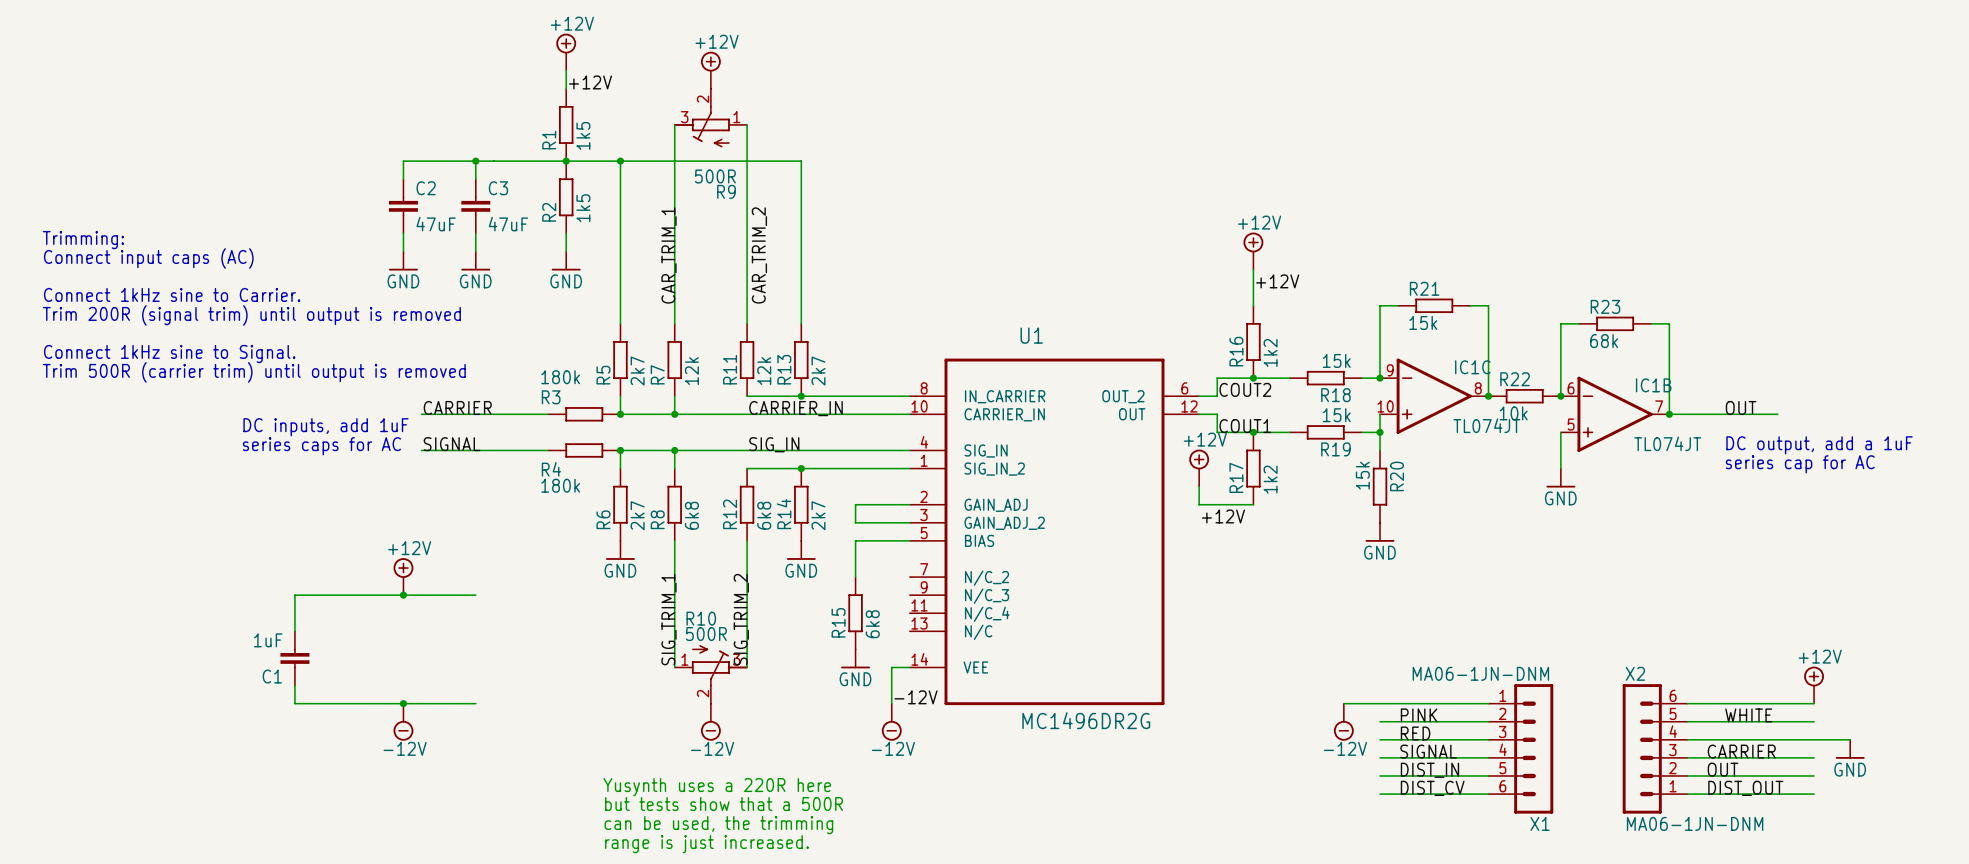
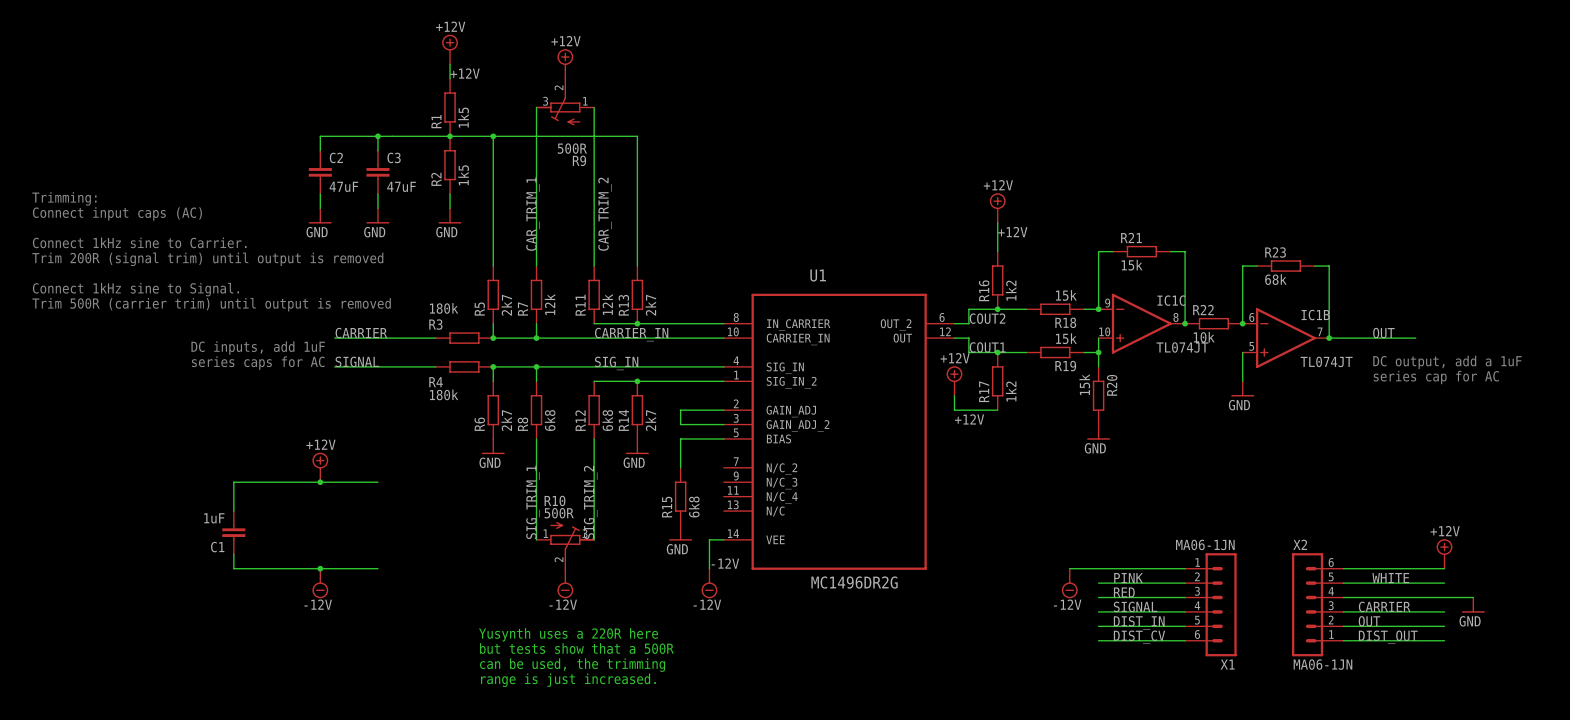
X1 value: MA06-1JN-DNM (1480, 673) -> MA06-1JN (1205, 544)
X2 value: MA06-1JN-DNM (1695, 823) -> MA06-1JN (1322, 664)

